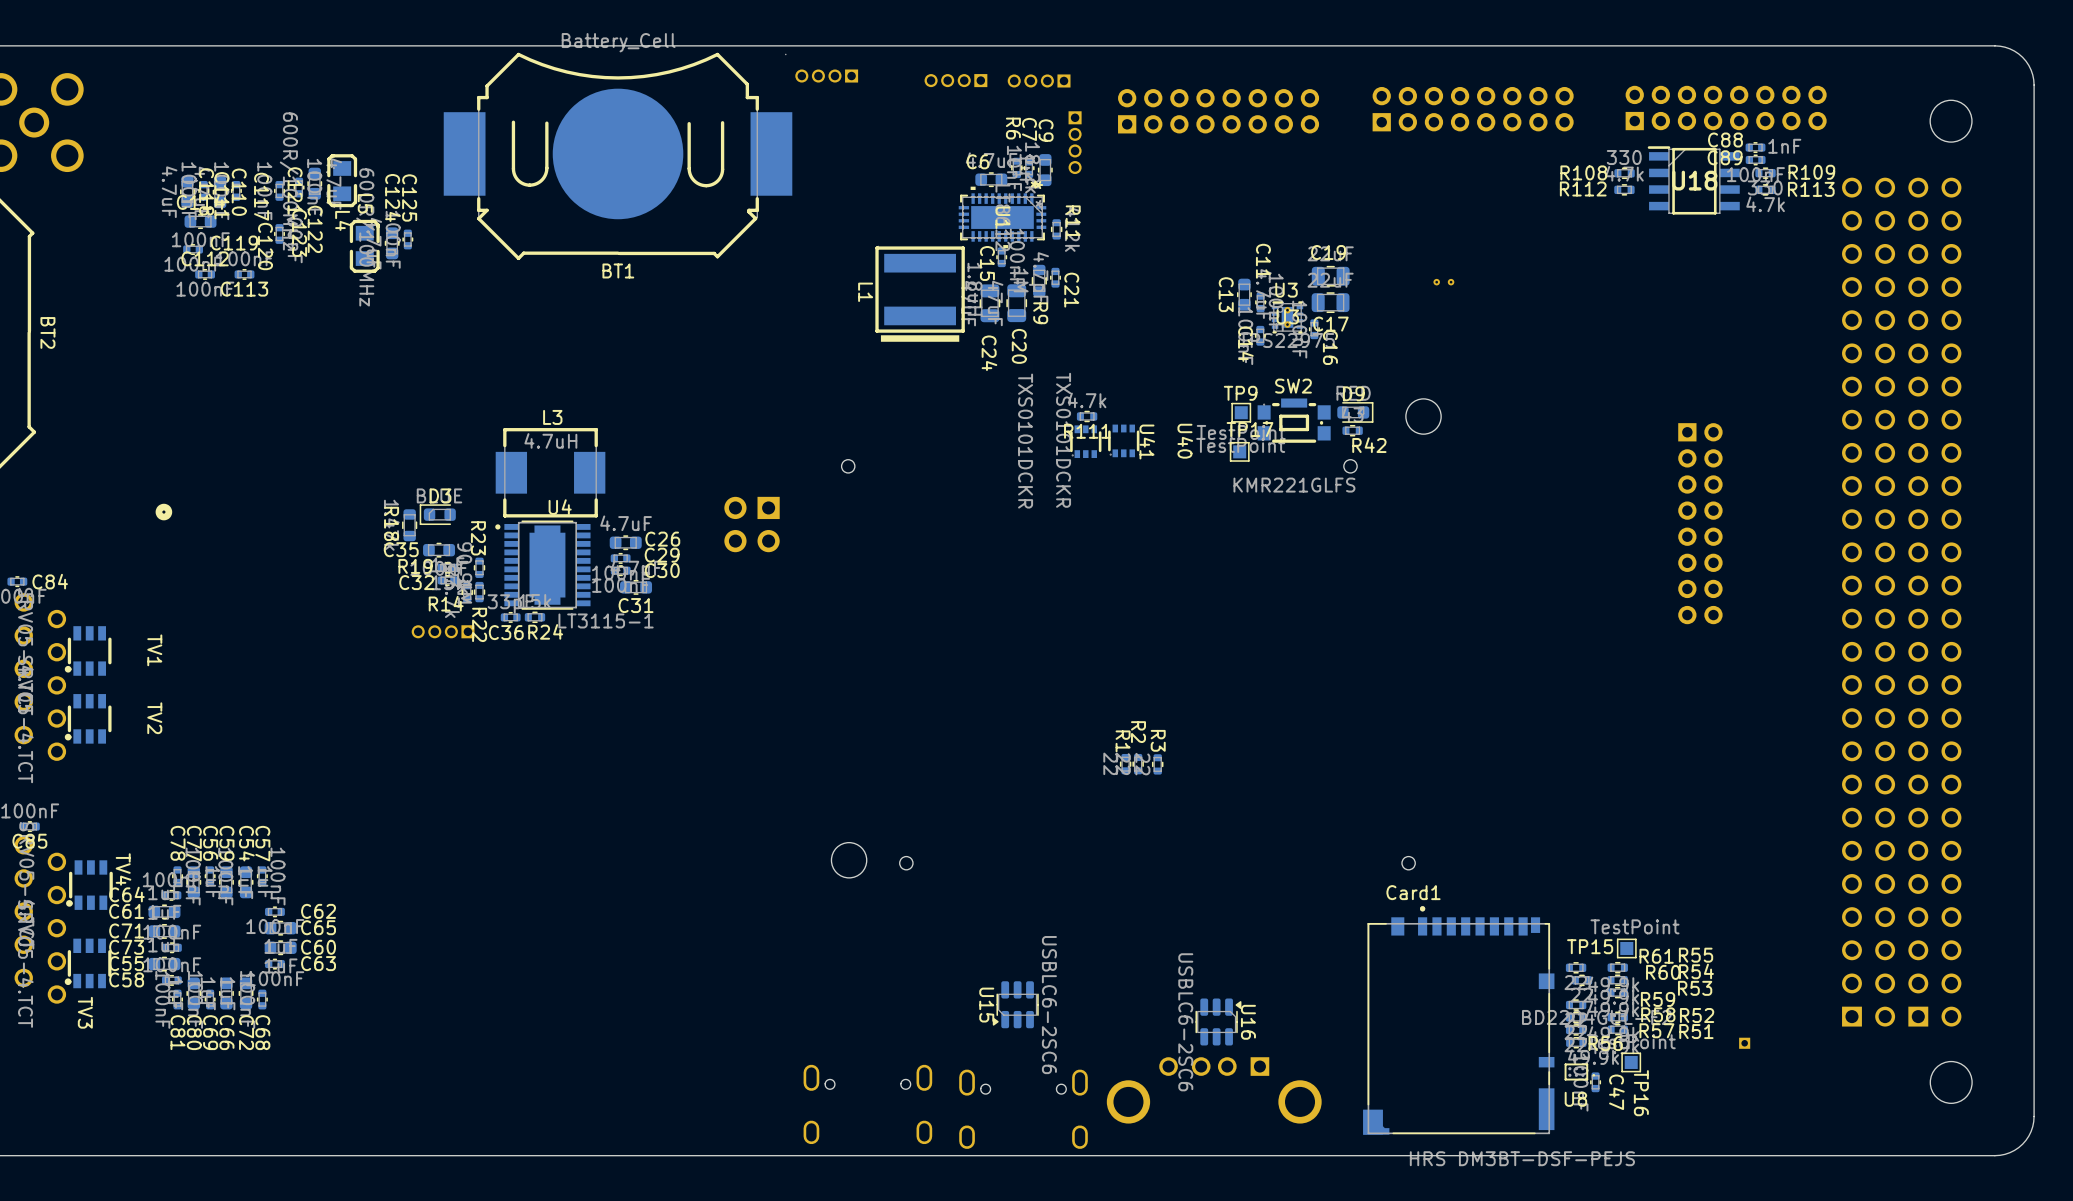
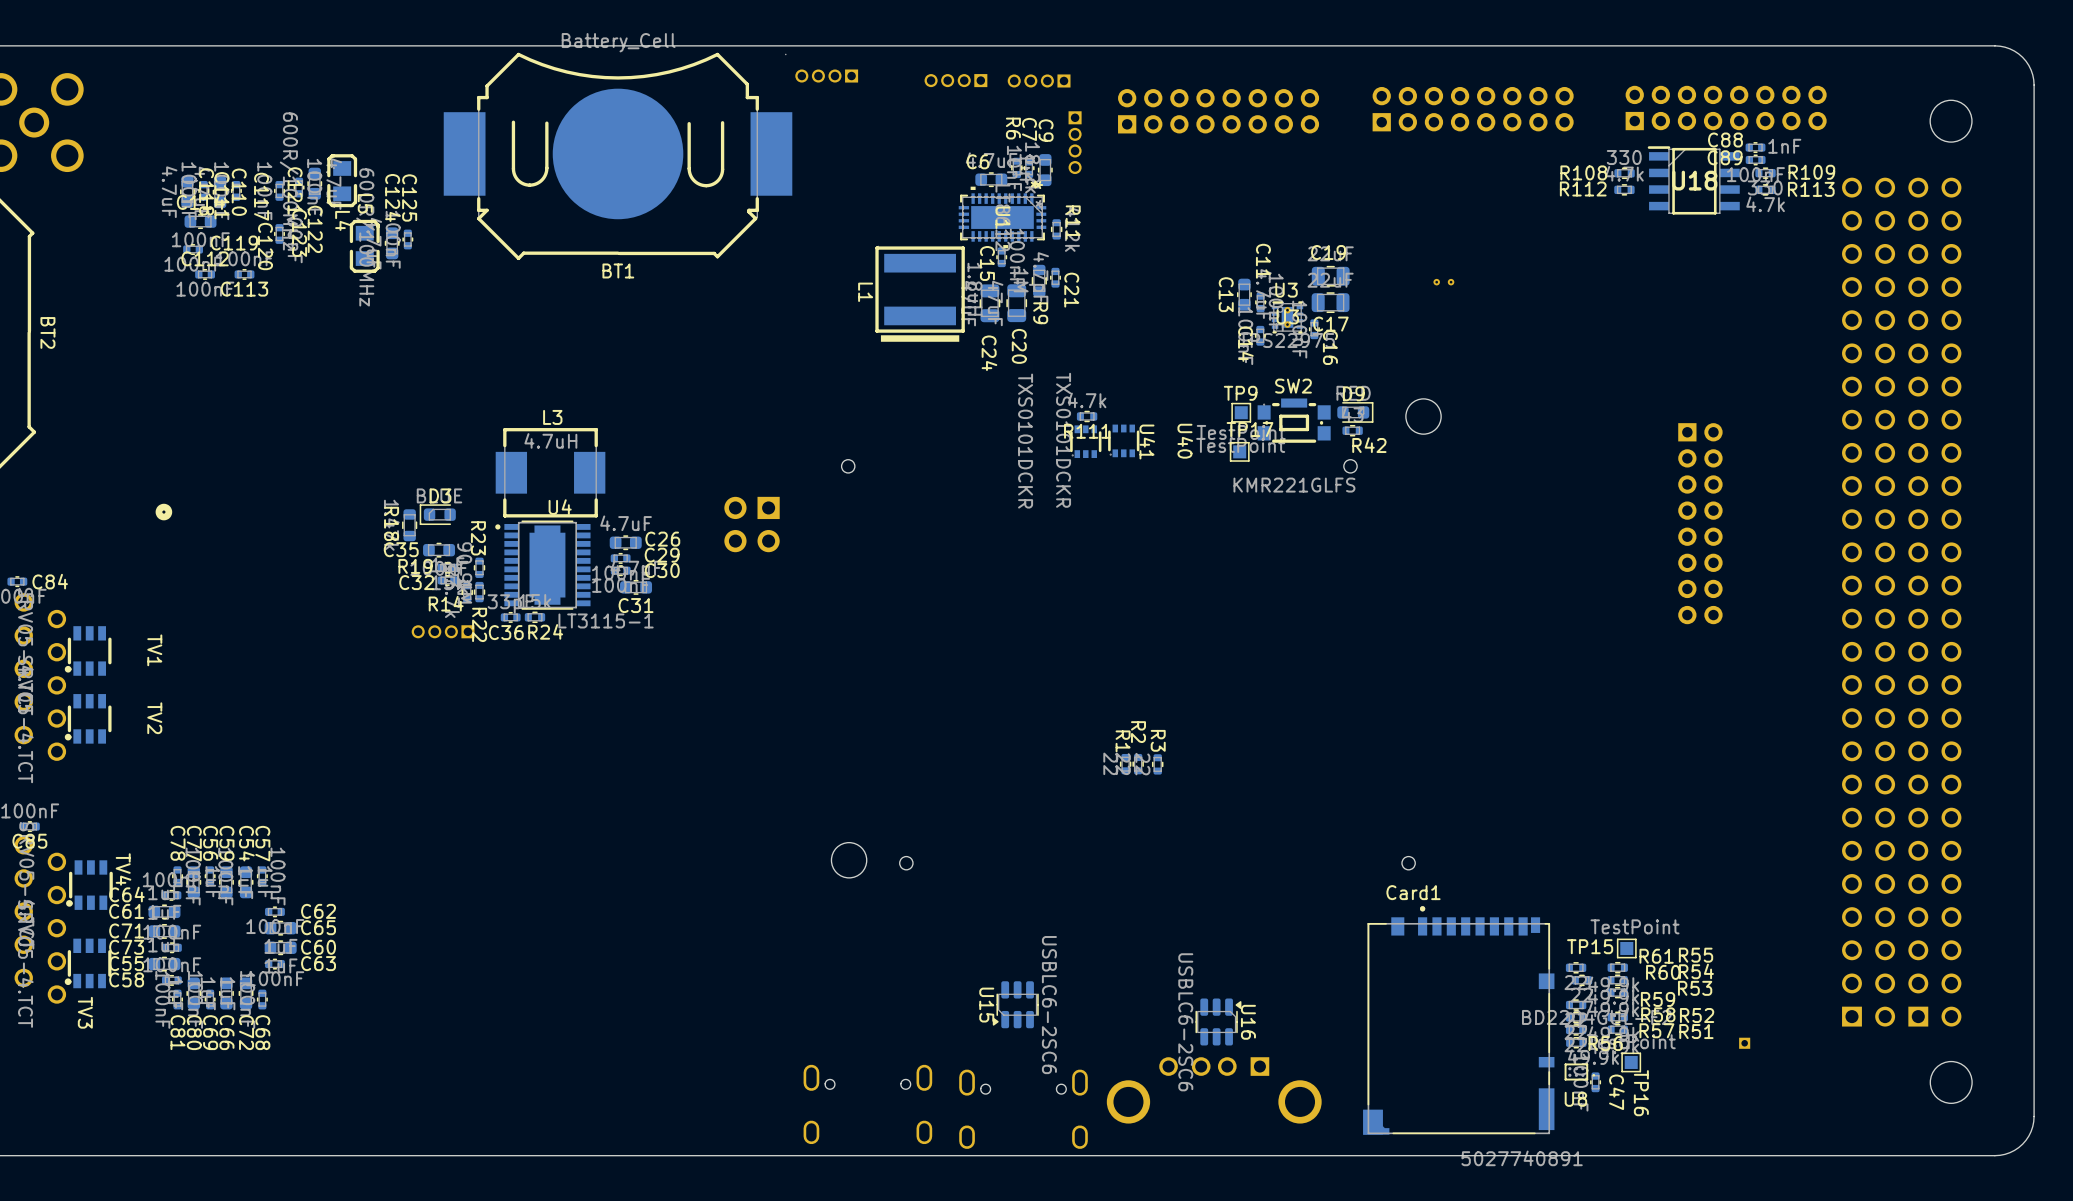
Card1 value: HRS DM3BT-DSF-PEJS (1522, 1158) -> 5027740891 (1522, 1158)

